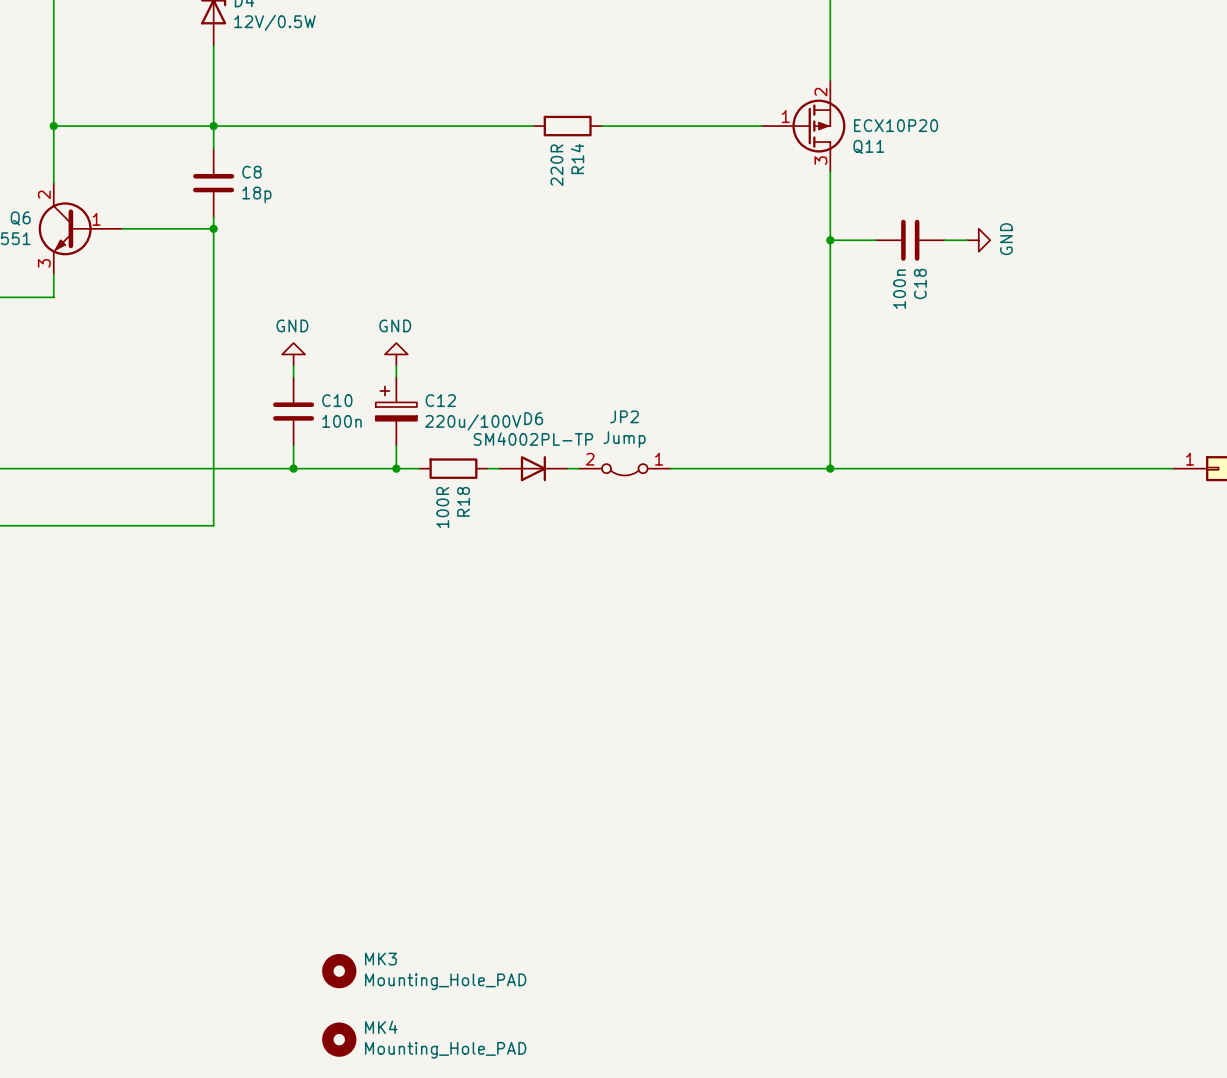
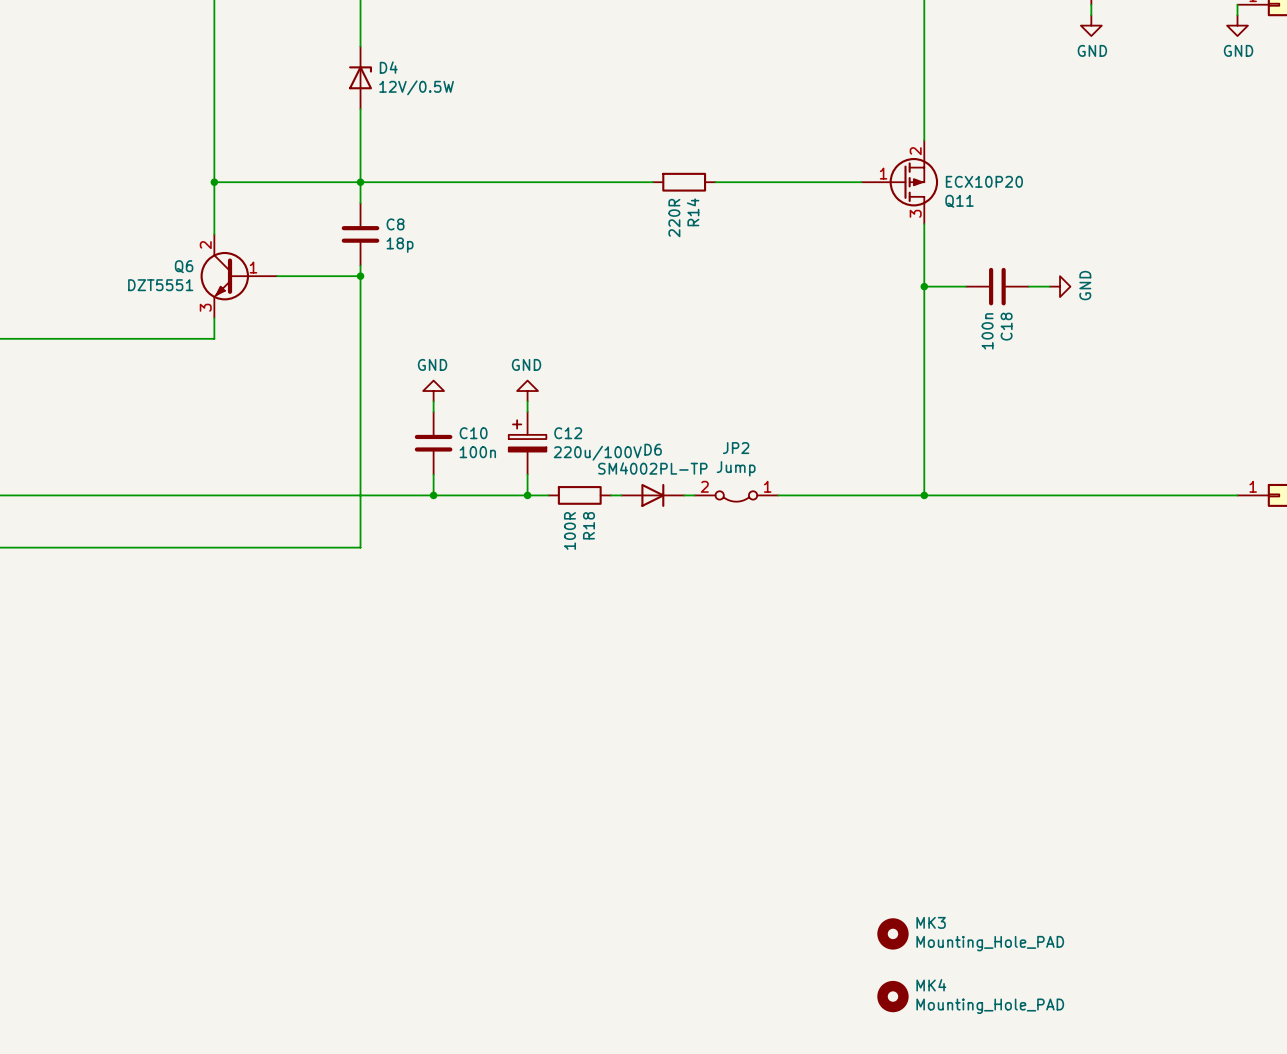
MK3 position: (339, 971) -> (892, 933)
MK4 position: (339, 1039) -> (892, 996)

